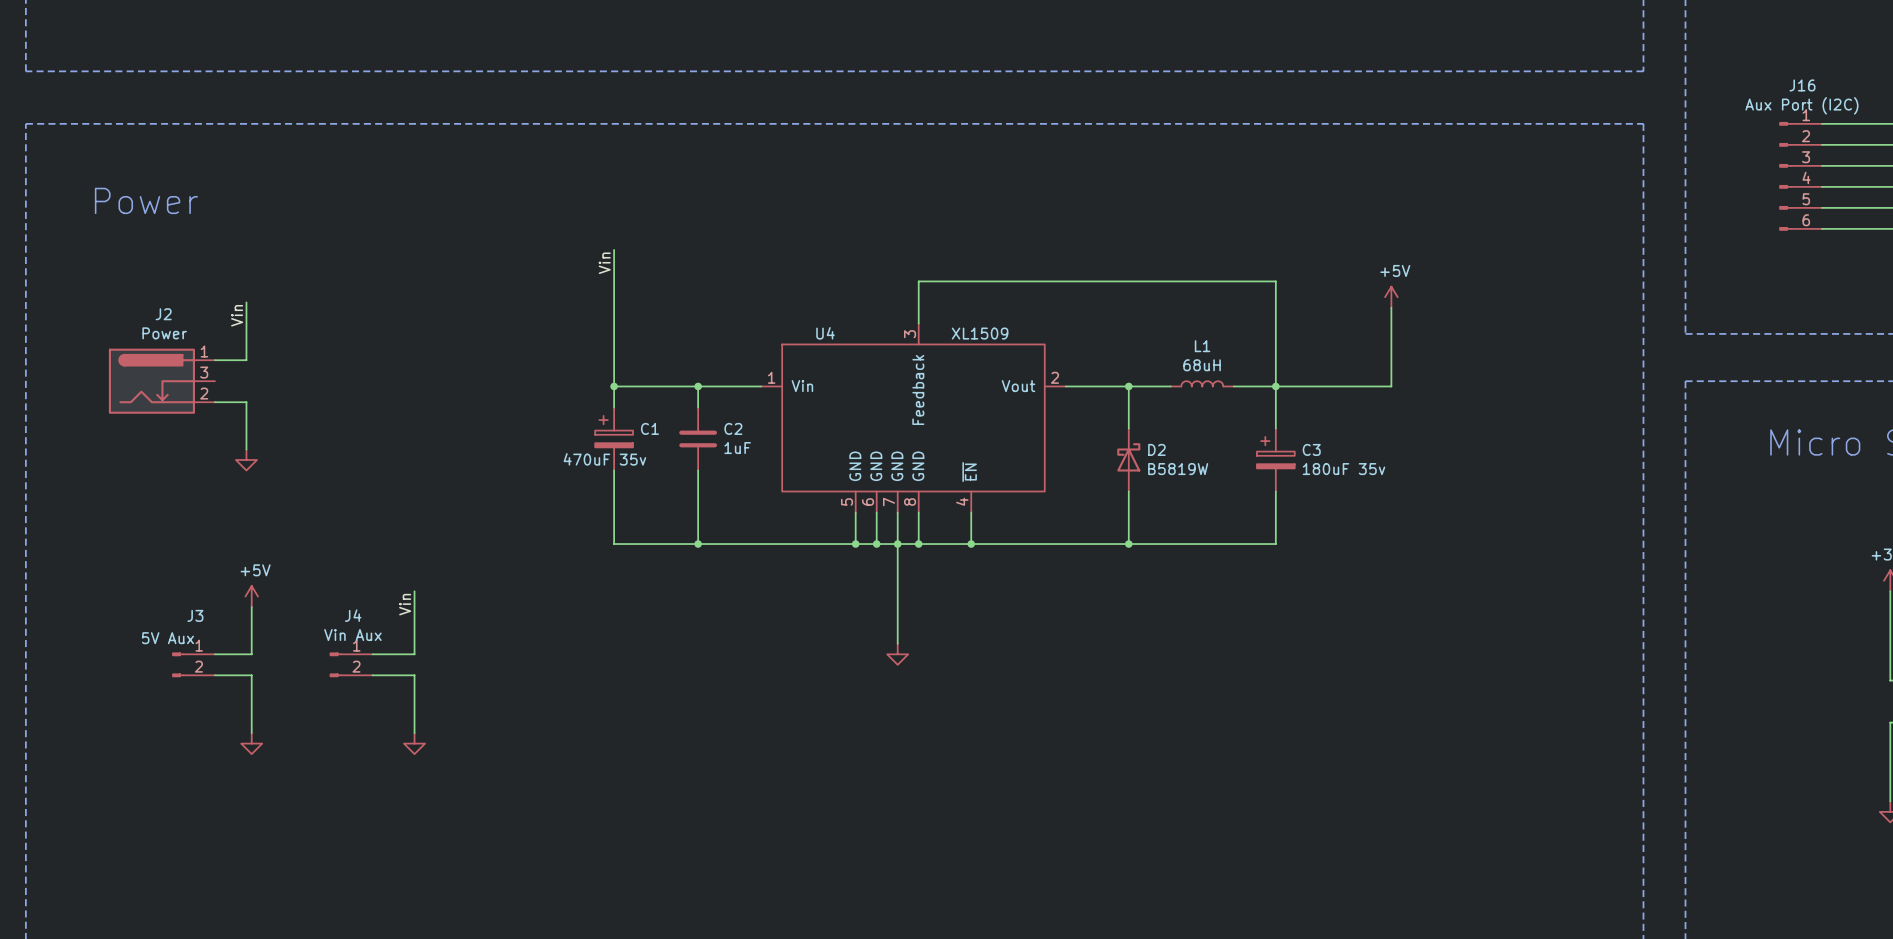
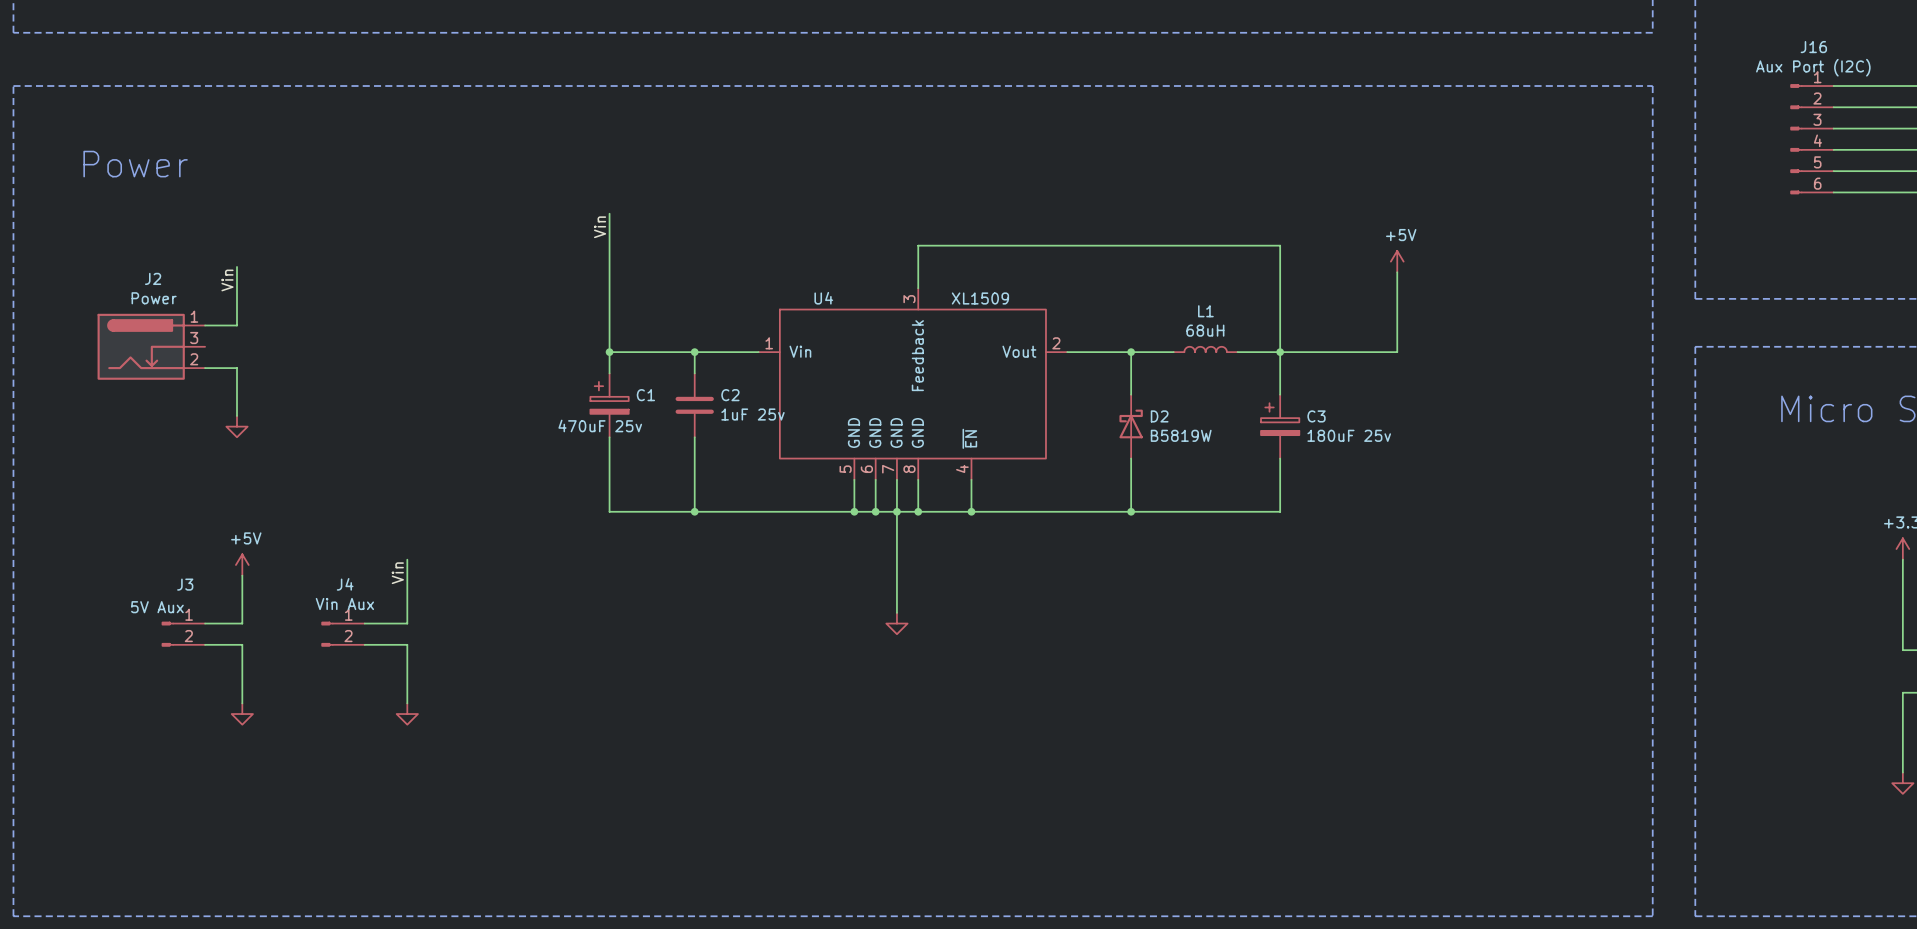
C2 value: 1uF (737, 448) -> 1uF 25v (752, 414)
C1 value: 470uF 35v (604, 459) -> 470uF 25v (600, 425)
C3 value: 180uF 35v (1343, 469) -> 180uF 25v (1349, 435)

